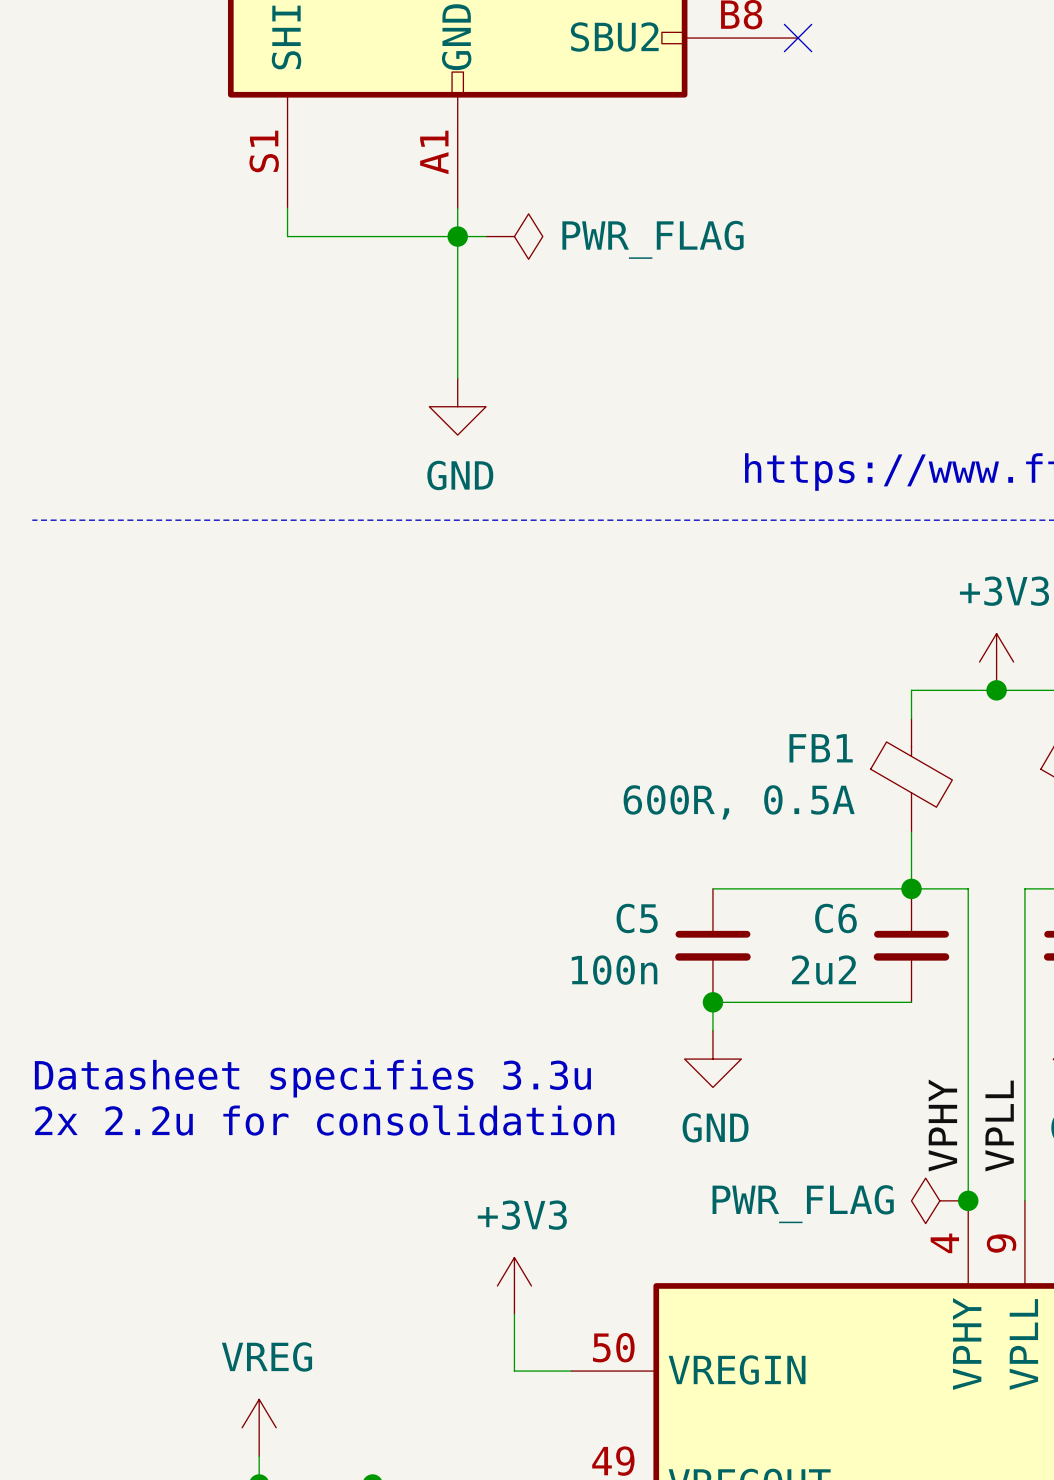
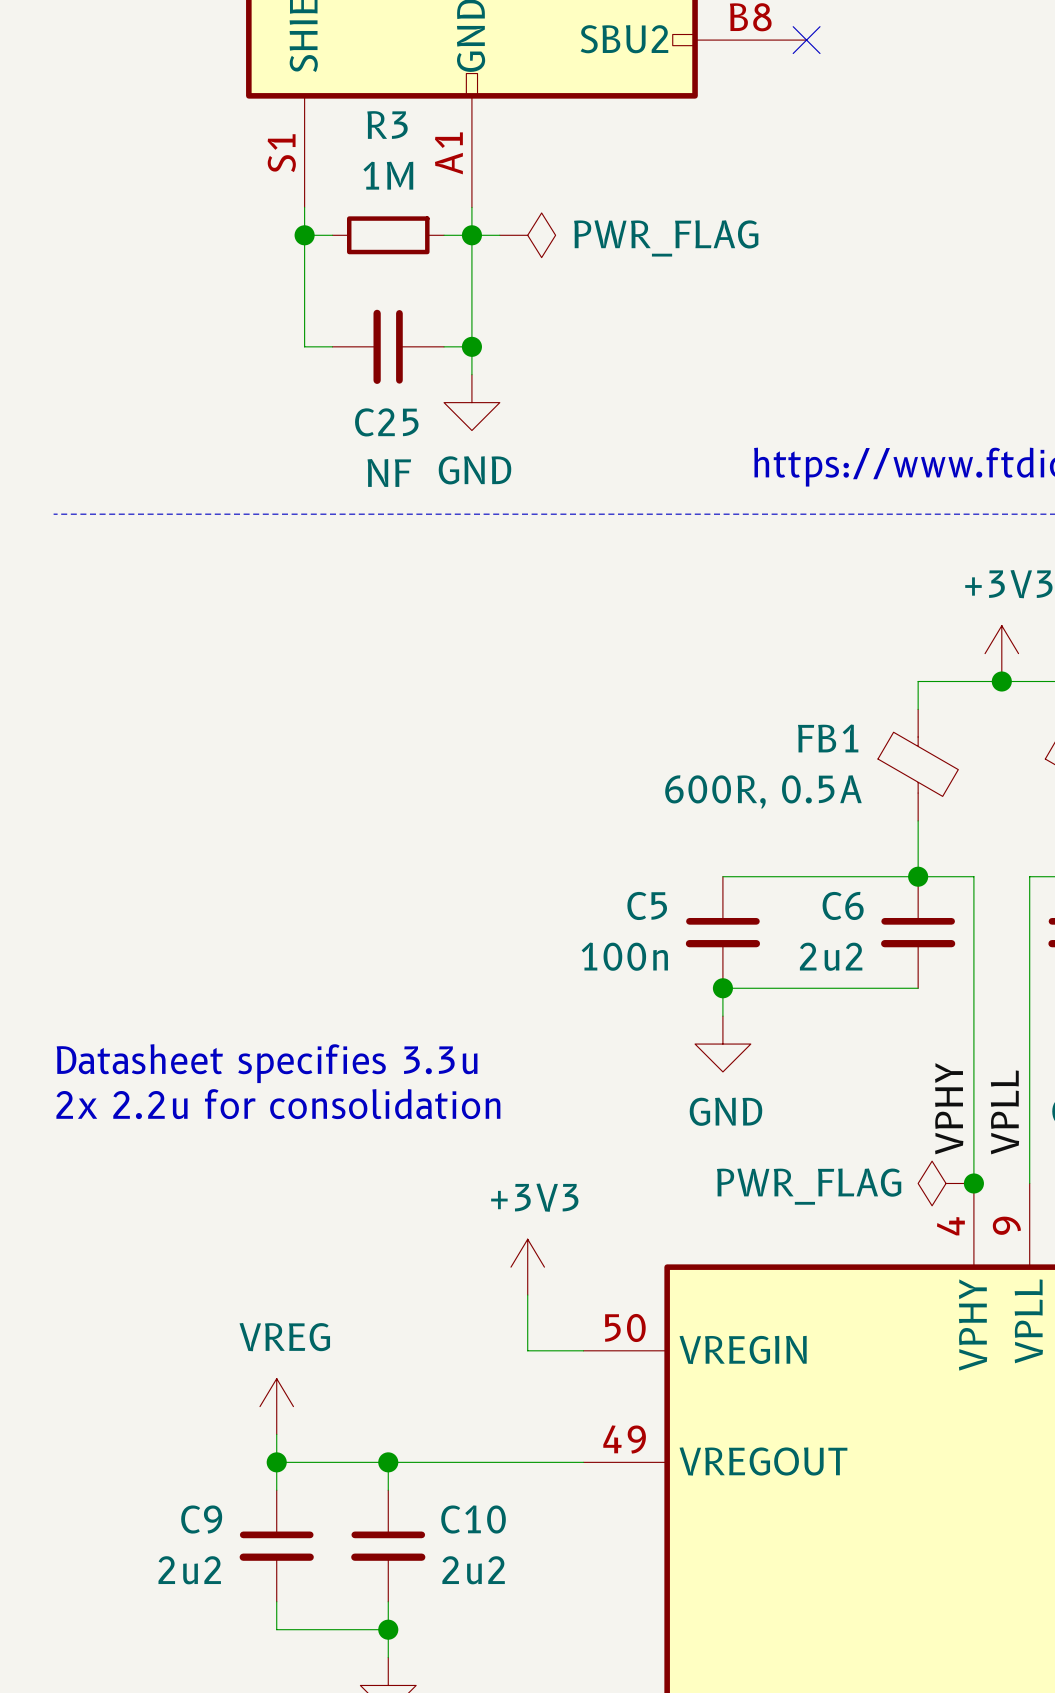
wire: none -> (304, 235) (304, 346) (332, 346)
junction: none -> (304, 235)
wire: (315, 236) (429, 236) -> none
R3: none -> 1M (388, 235)
C25: none -> NF (388, 346)
wire: none -> (444, 346) (471, 346)
junction: none -> (471, 346)

